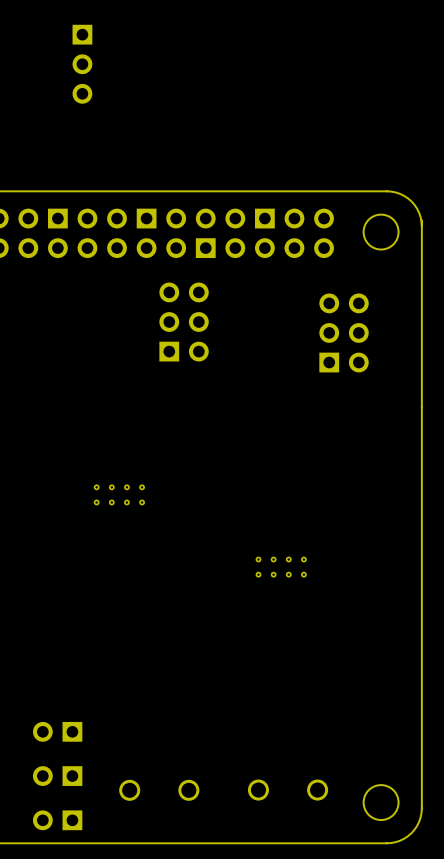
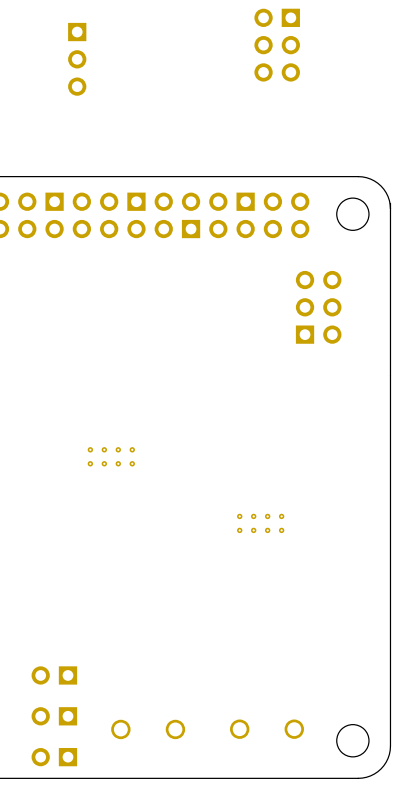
part: none -> (277, 45)
part: (184, 322) -> none

